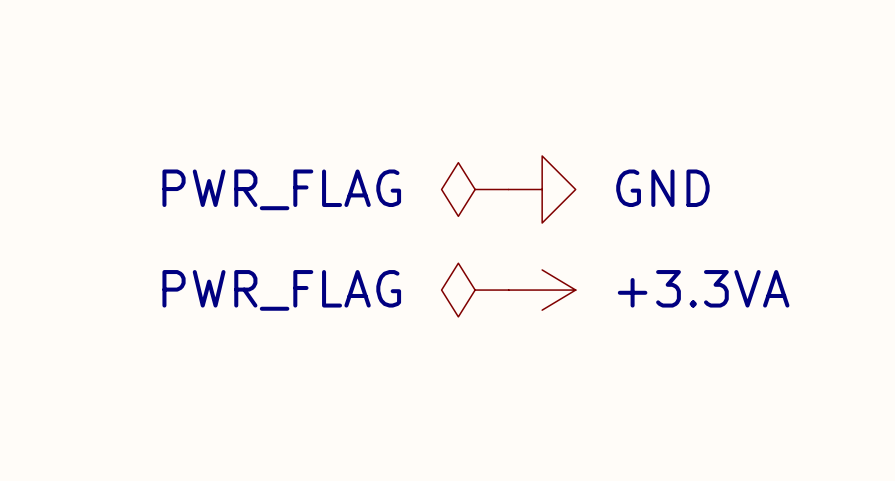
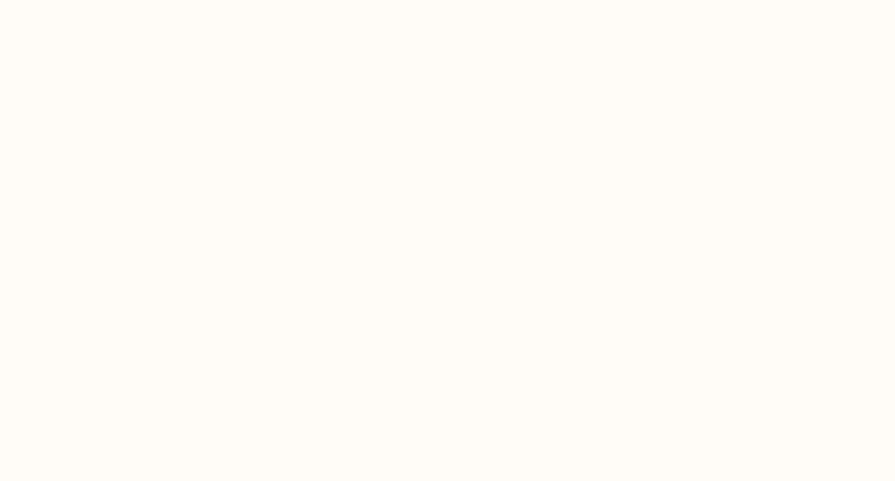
power symbol: PWR_FLAG (475, 189) -> none
power symbol: GND (542, 189) -> none
power symbol: PWR_FLAG (475, 290) -> none
power symbol: +3.3VA (542, 290) -> none

